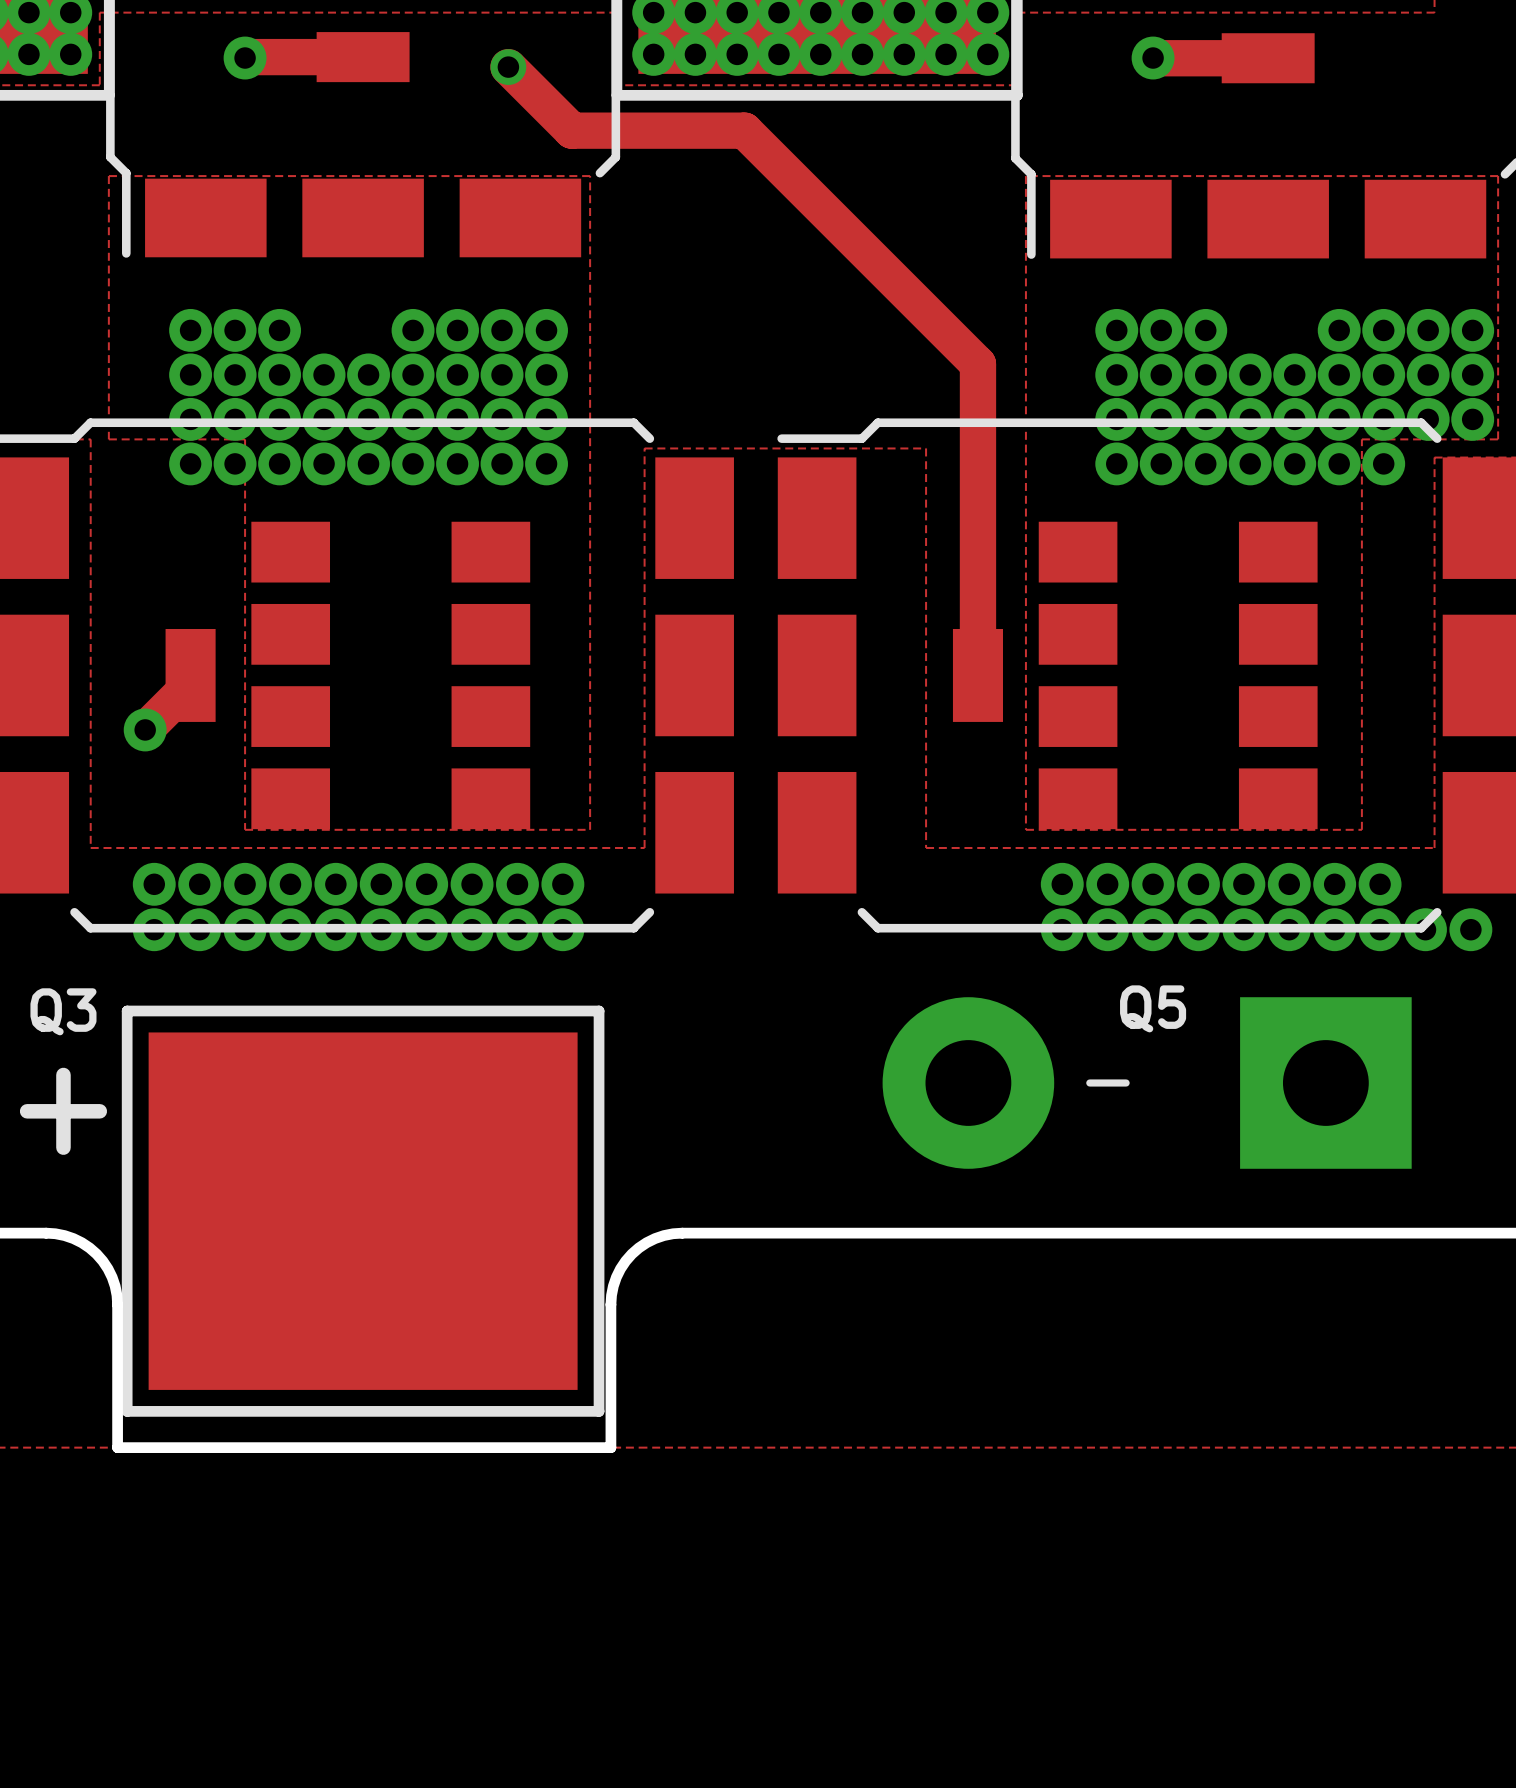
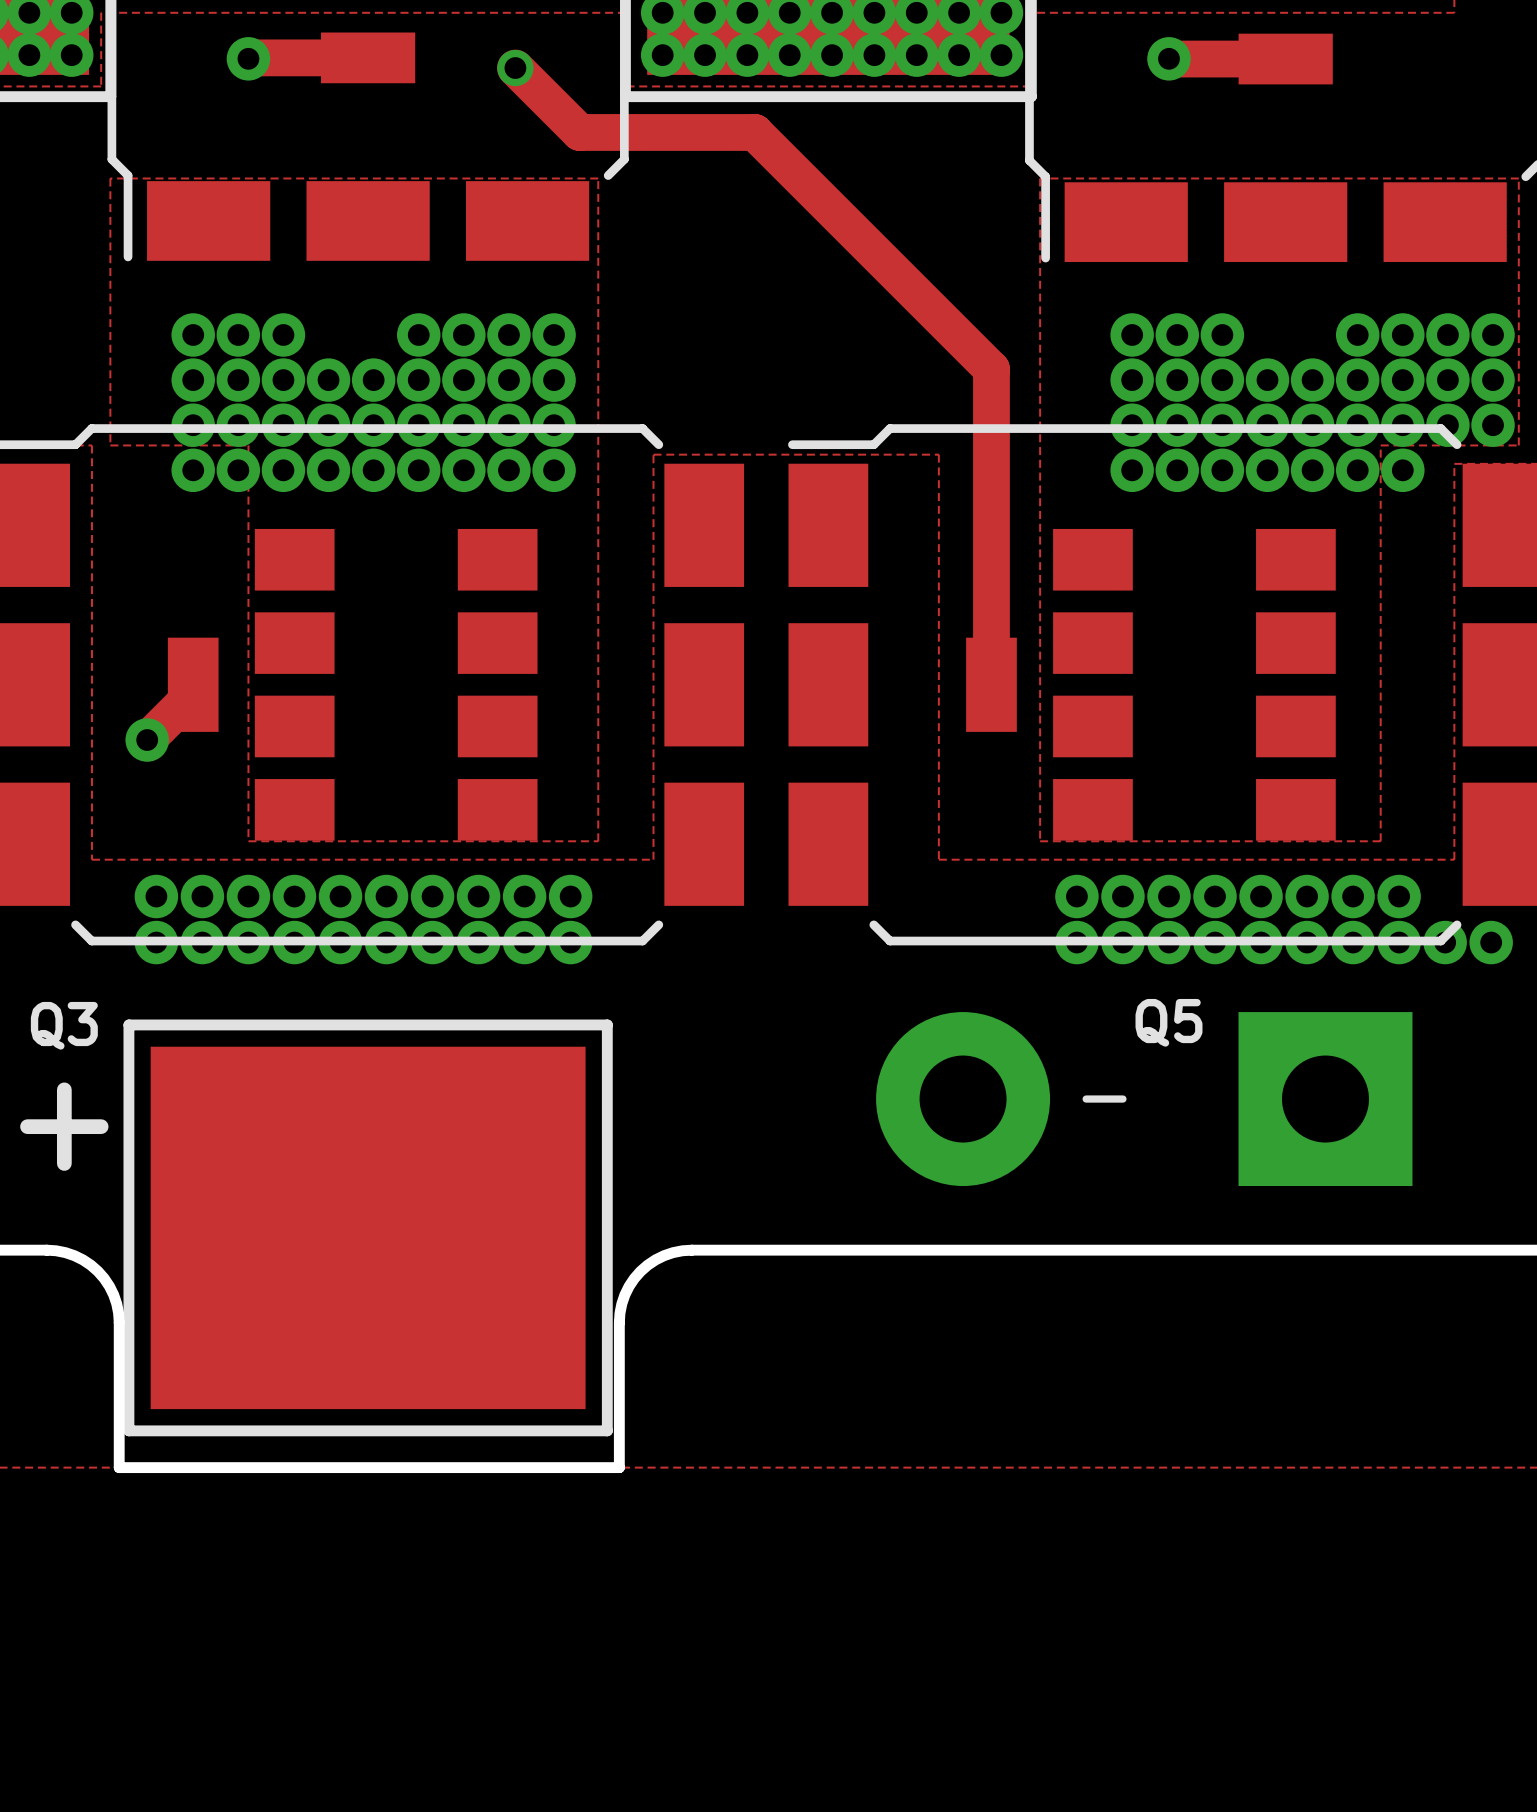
part position: (1147, 1082) -> (1144, 1099)

